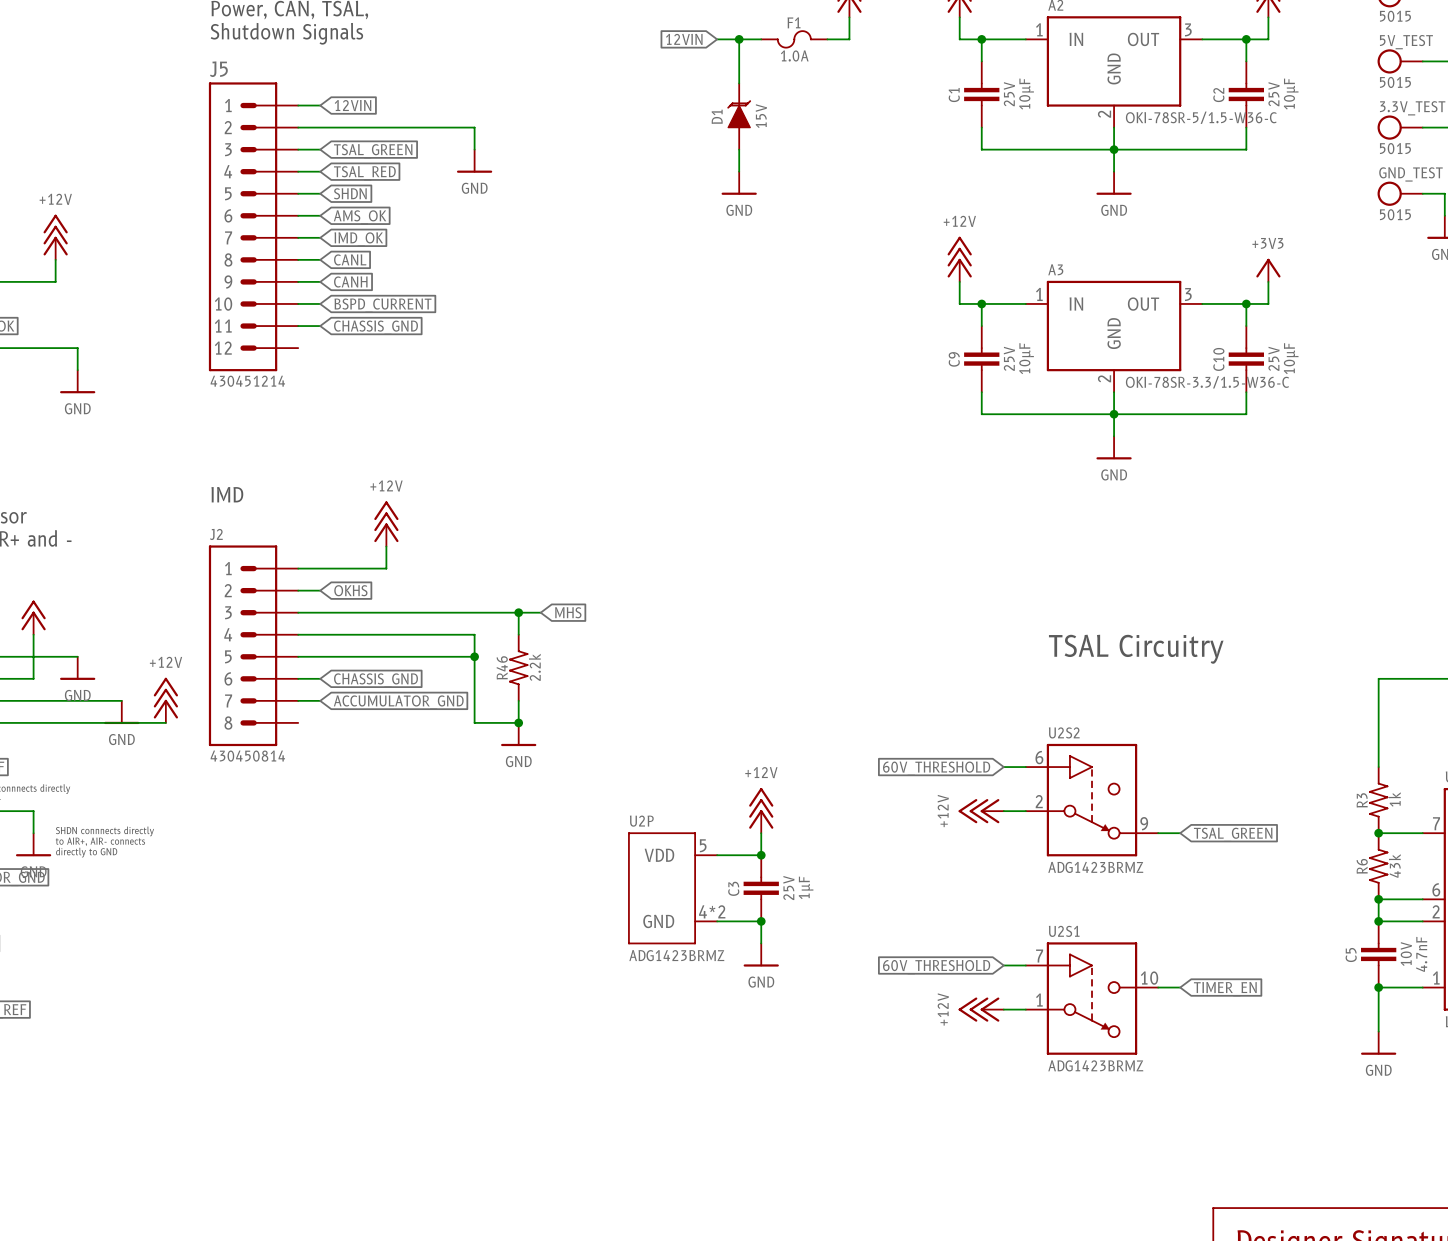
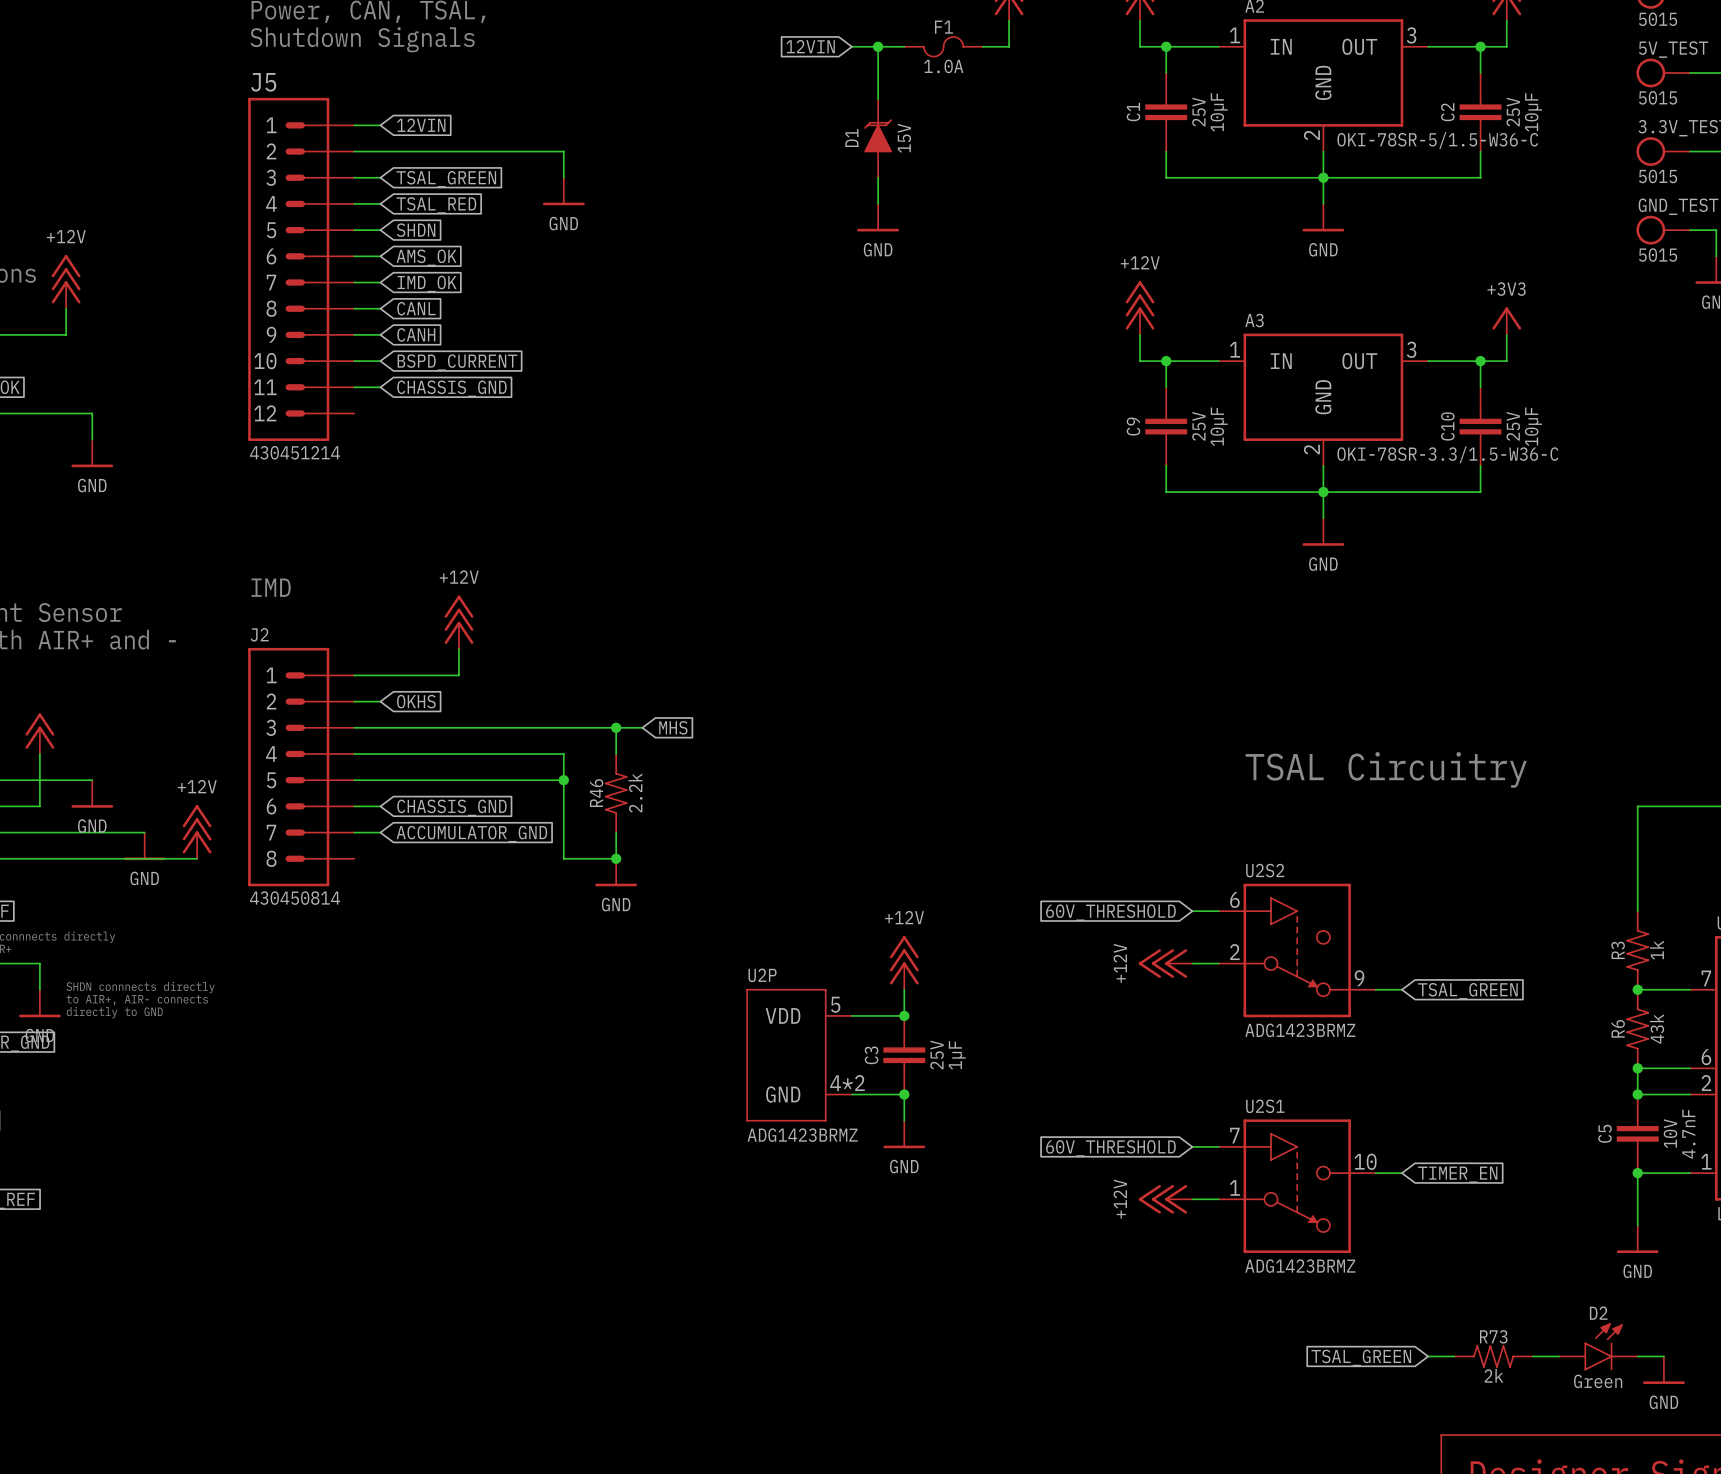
D2: none -> (1598, 1346)
wire: none -> (1428, 1356) (1454, 1356)
R73: none -> (1493, 1356)
wire: none -> (1532, 1356) (1559, 1356)
wire: none -> (1637, 1356) (1663, 1356)
global label: none -> TSAL_GREEN (1361, 1357)
power symbol: none -> GND (1663, 1370)

